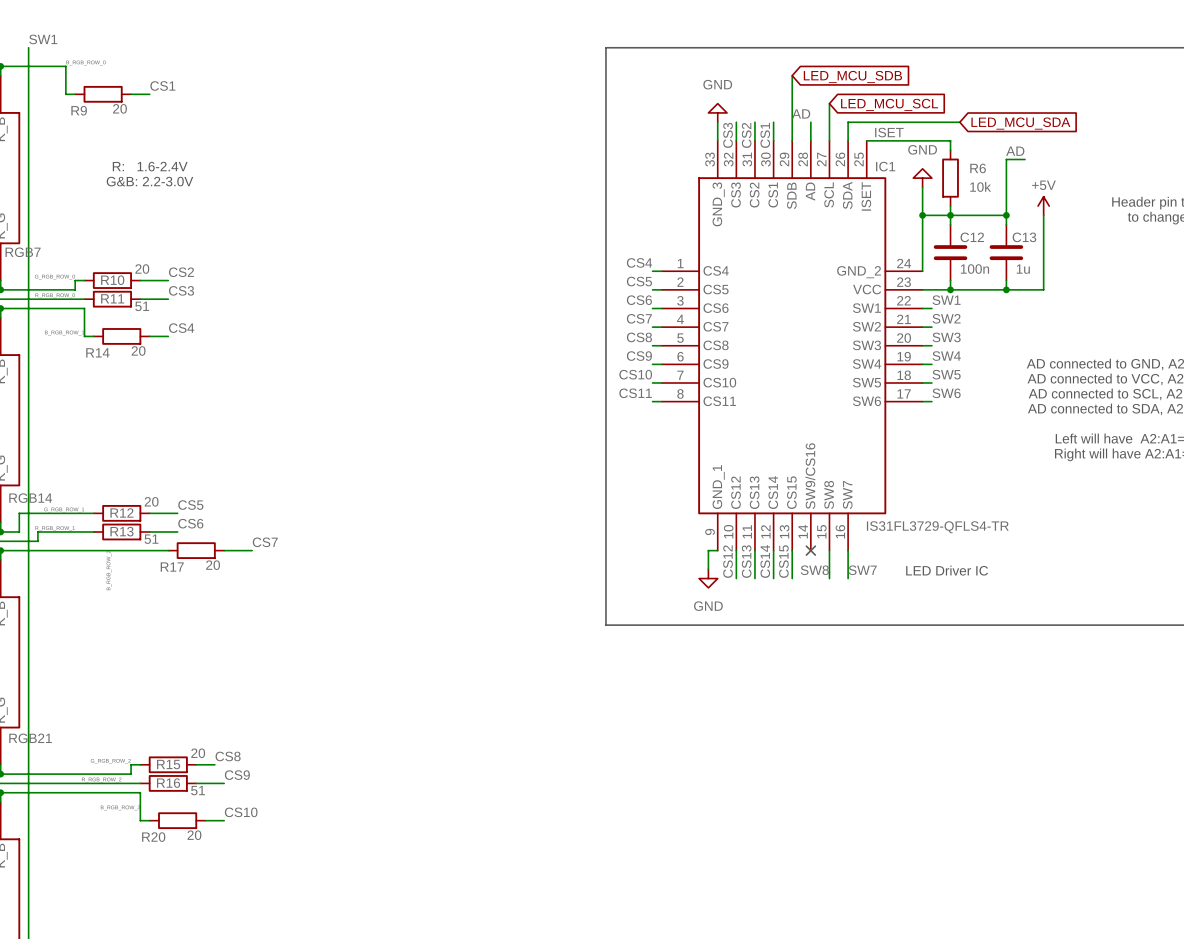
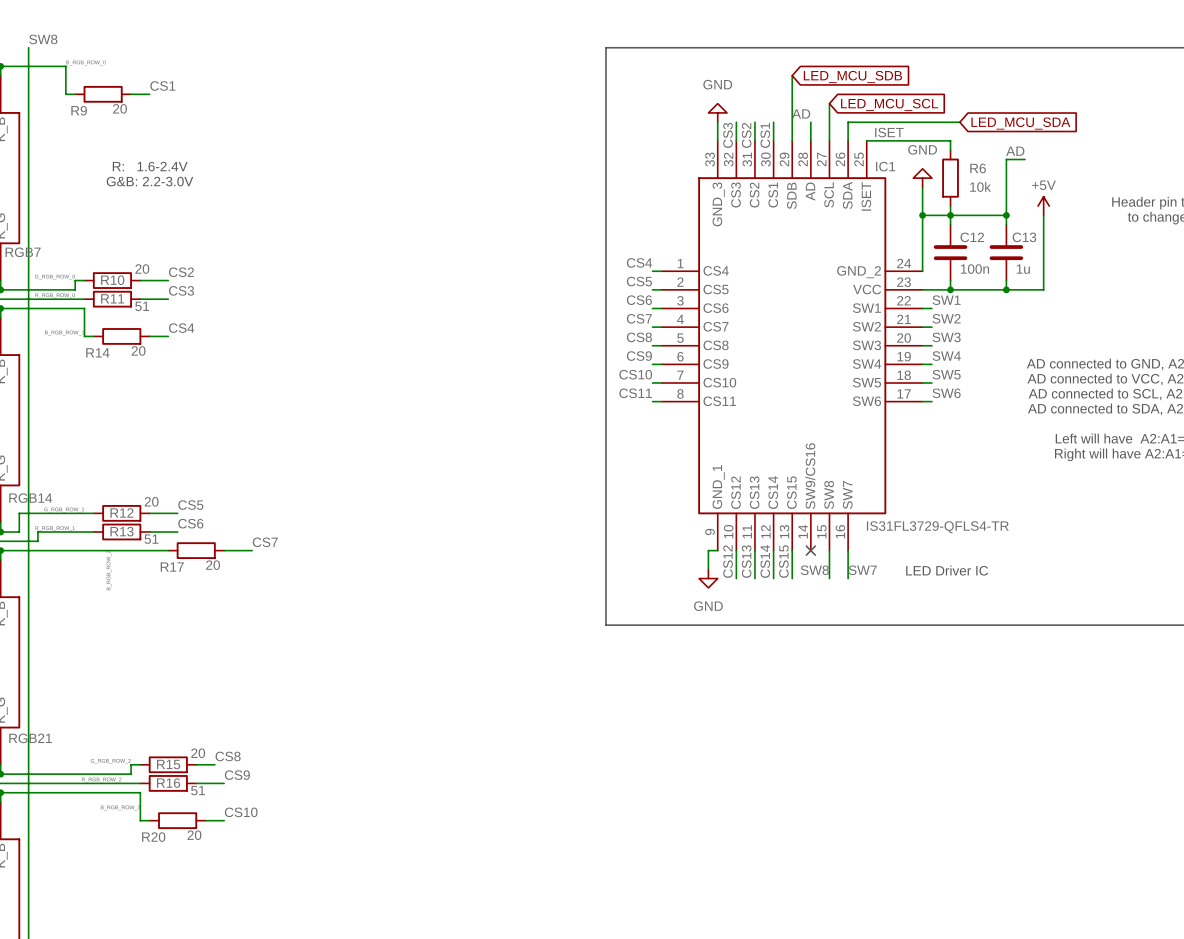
label: SW1 (43, 39) -> SW8 (43, 39)

